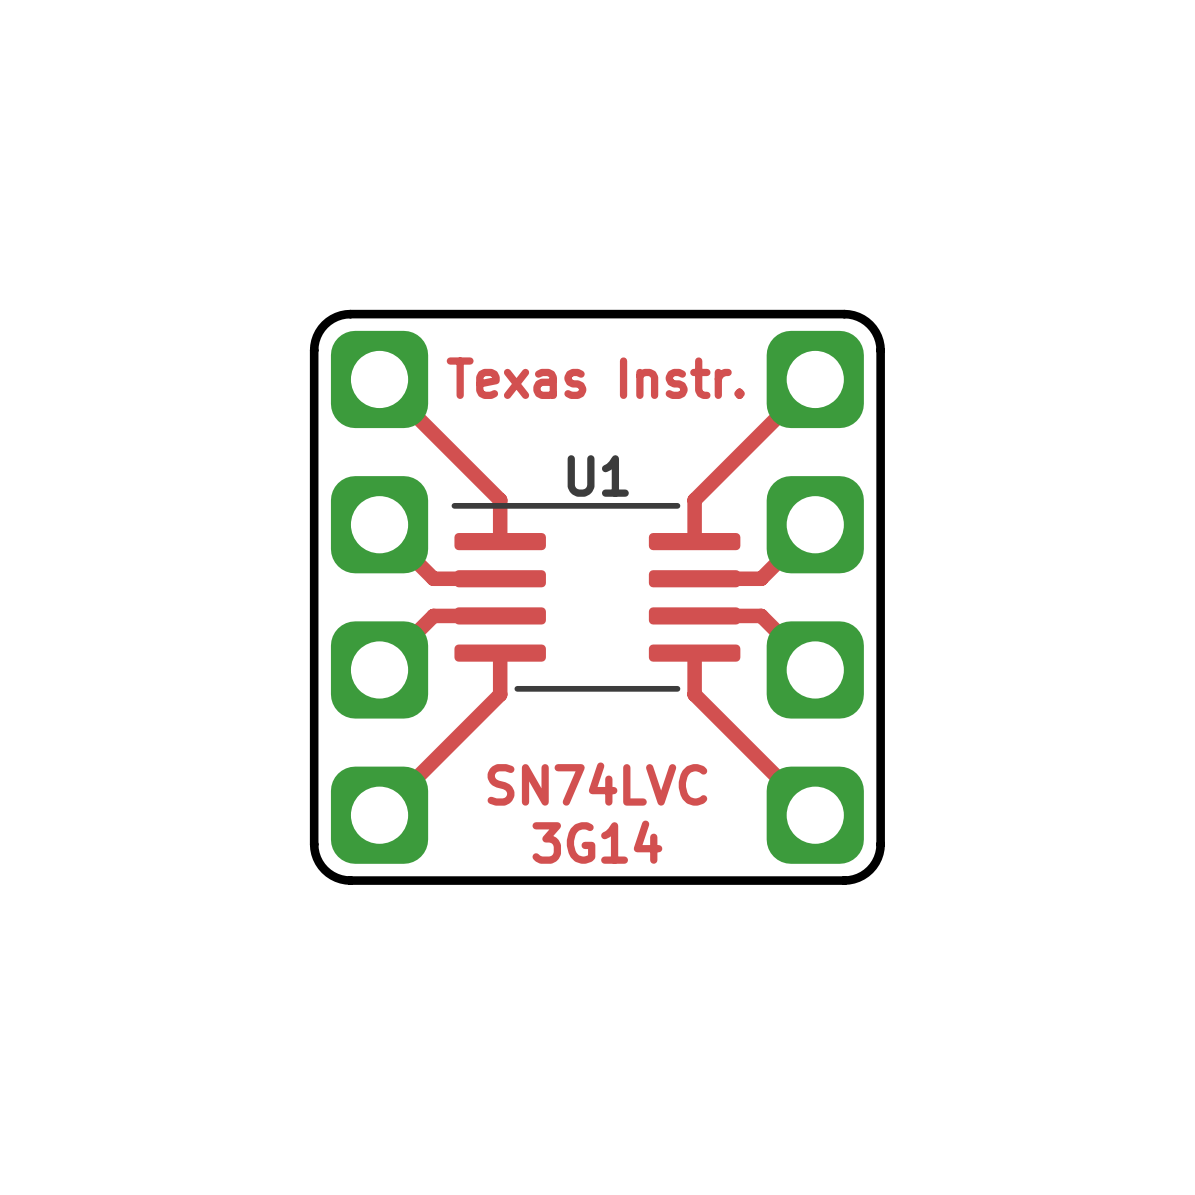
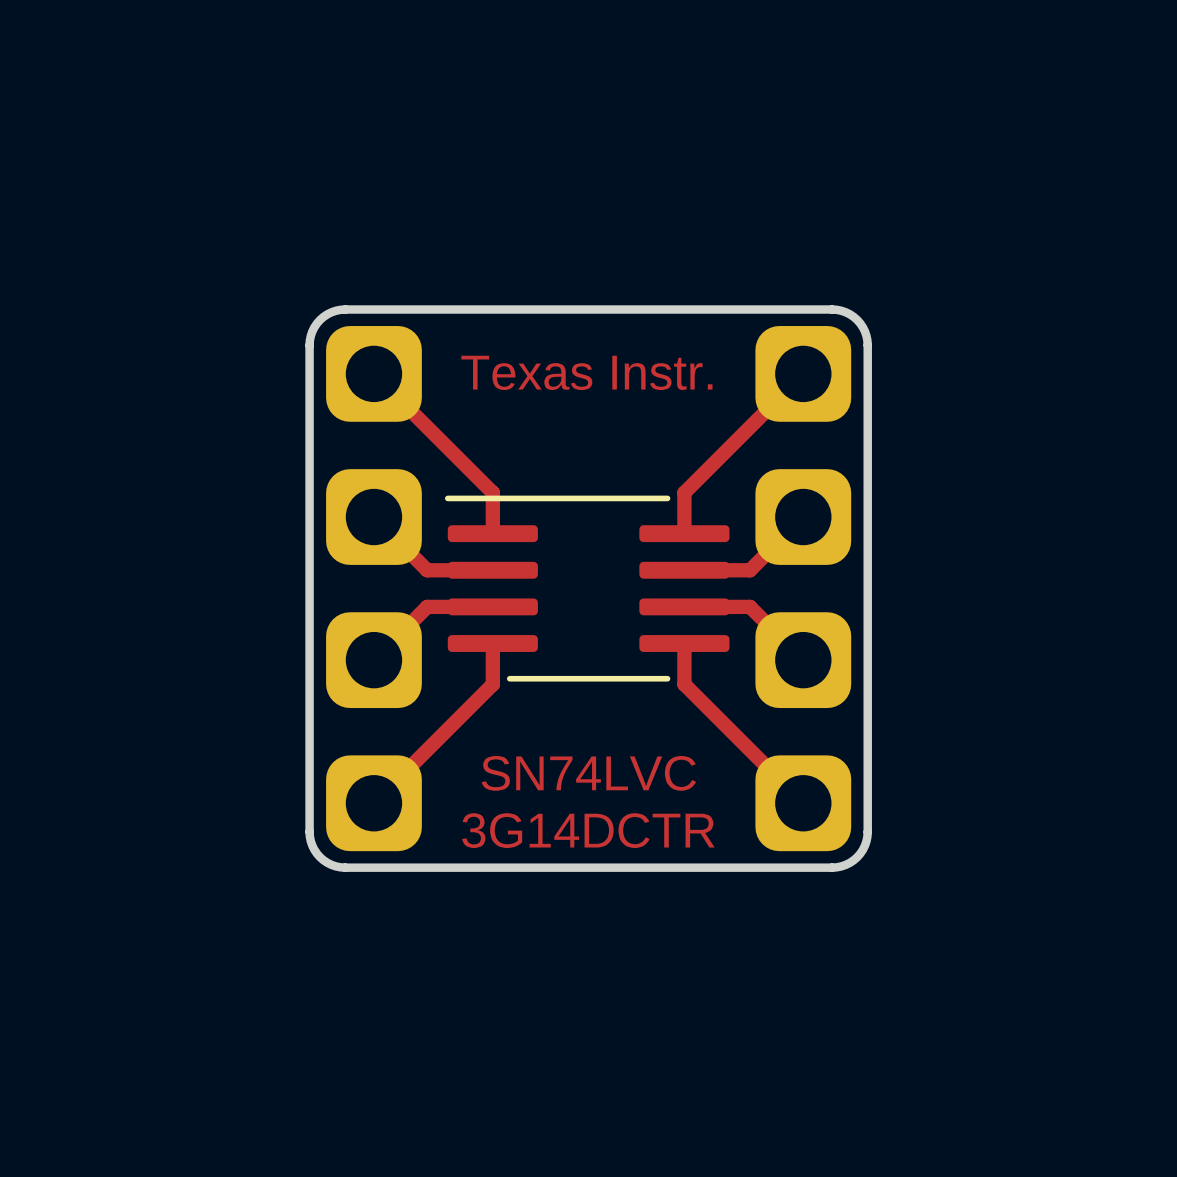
U1 name: U1 (598, 475) -> none
text: 3G14 (597, 842) -> 3G14DCTR (588, 830)

